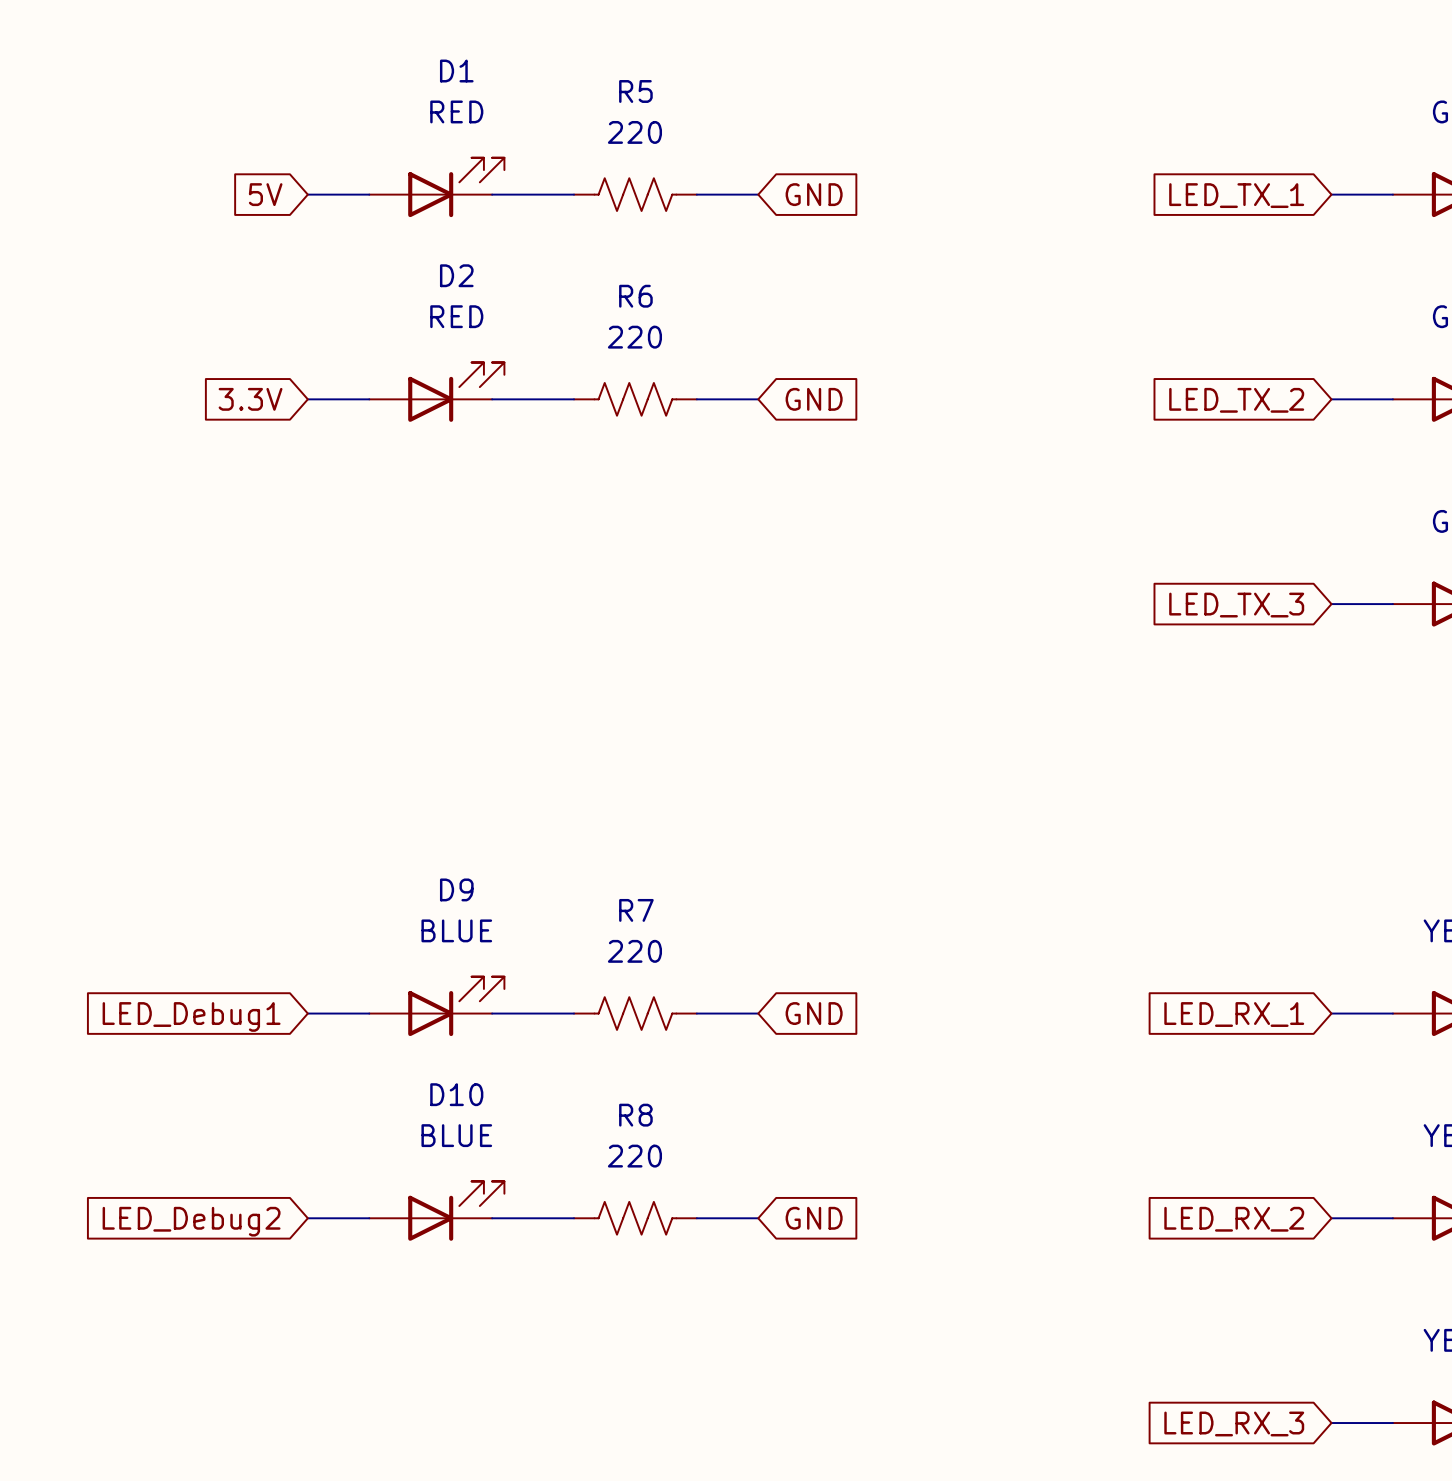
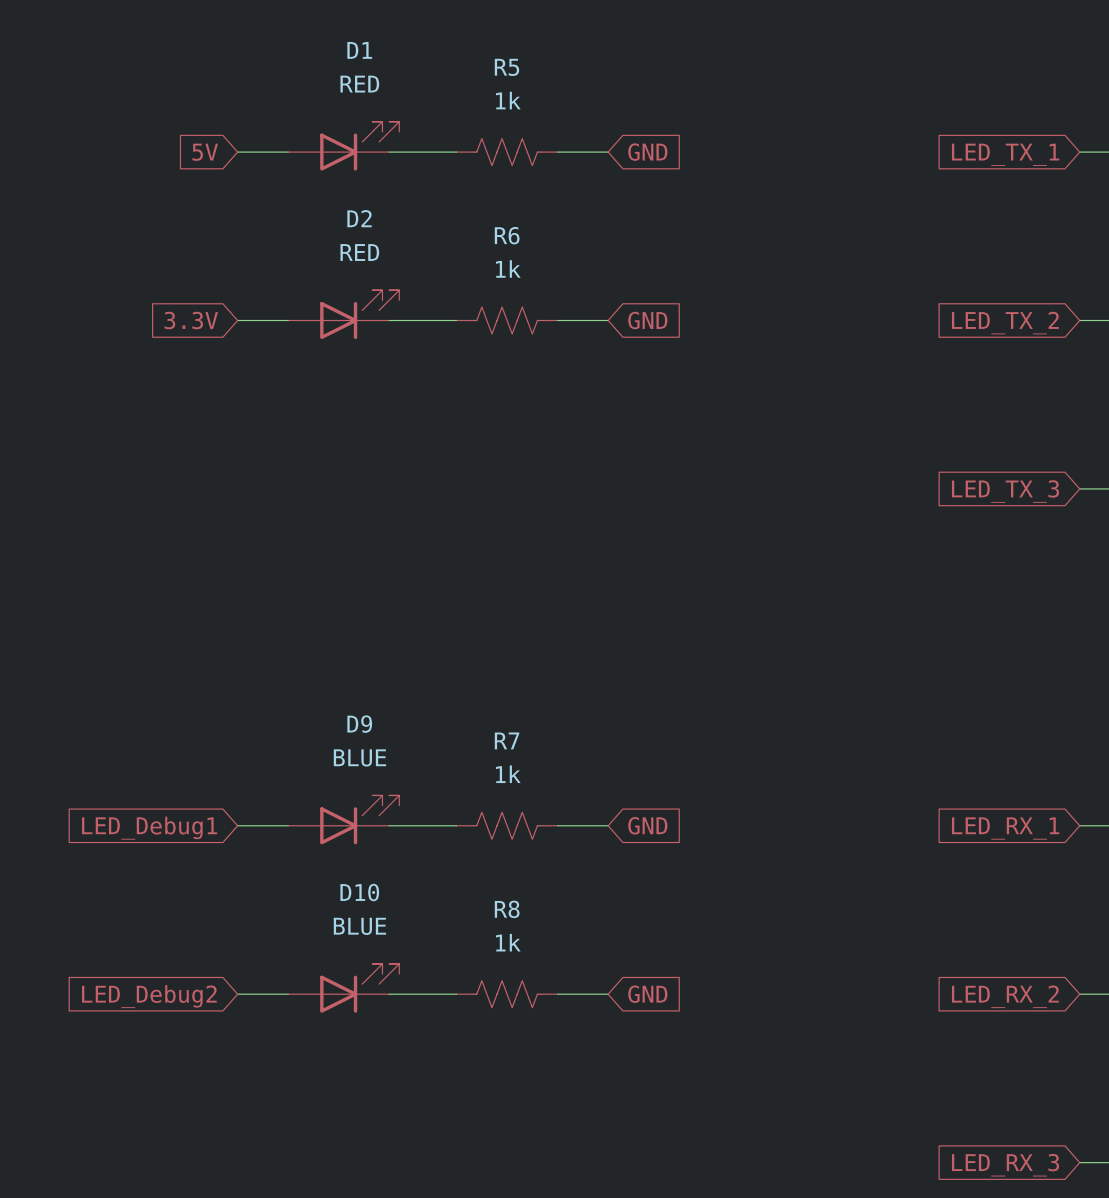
R5 value: 220 (634, 132) -> 1k (508, 100)
R6 value: 220 (634, 337) -> 1k (508, 268)
R7 value: 220 (634, 951) -> 1k (508, 774)
R8 value: 220 (634, 1156) -> 1k (508, 942)

